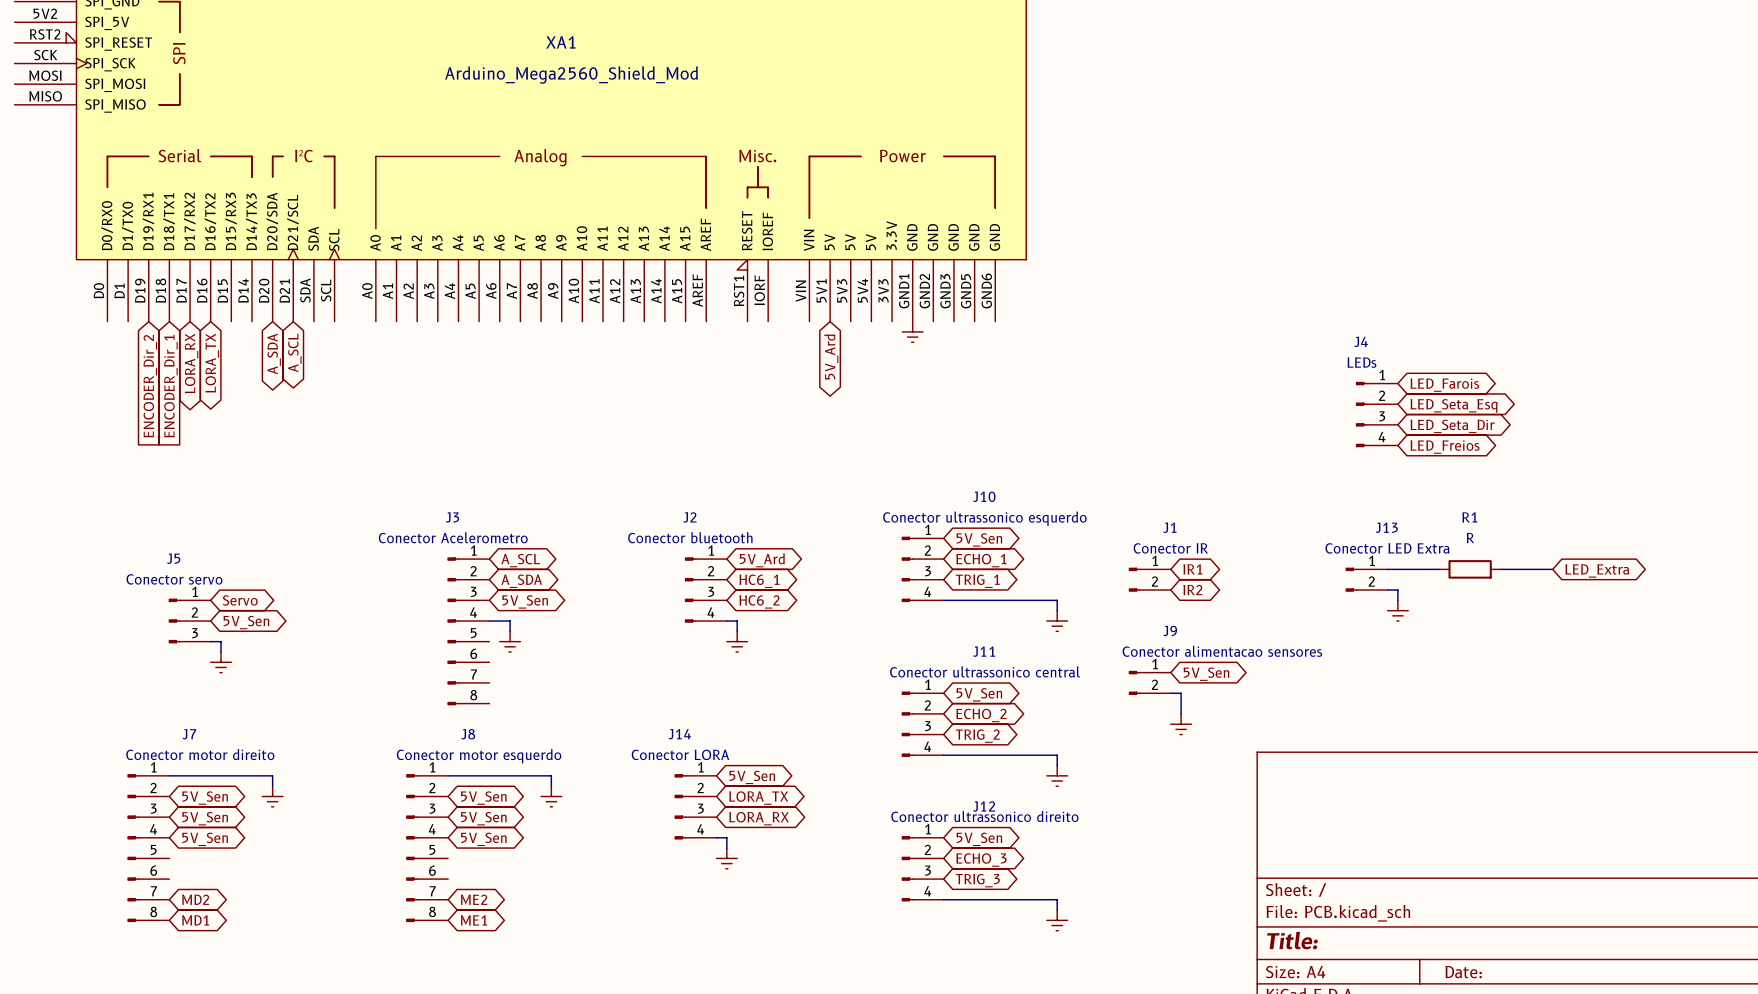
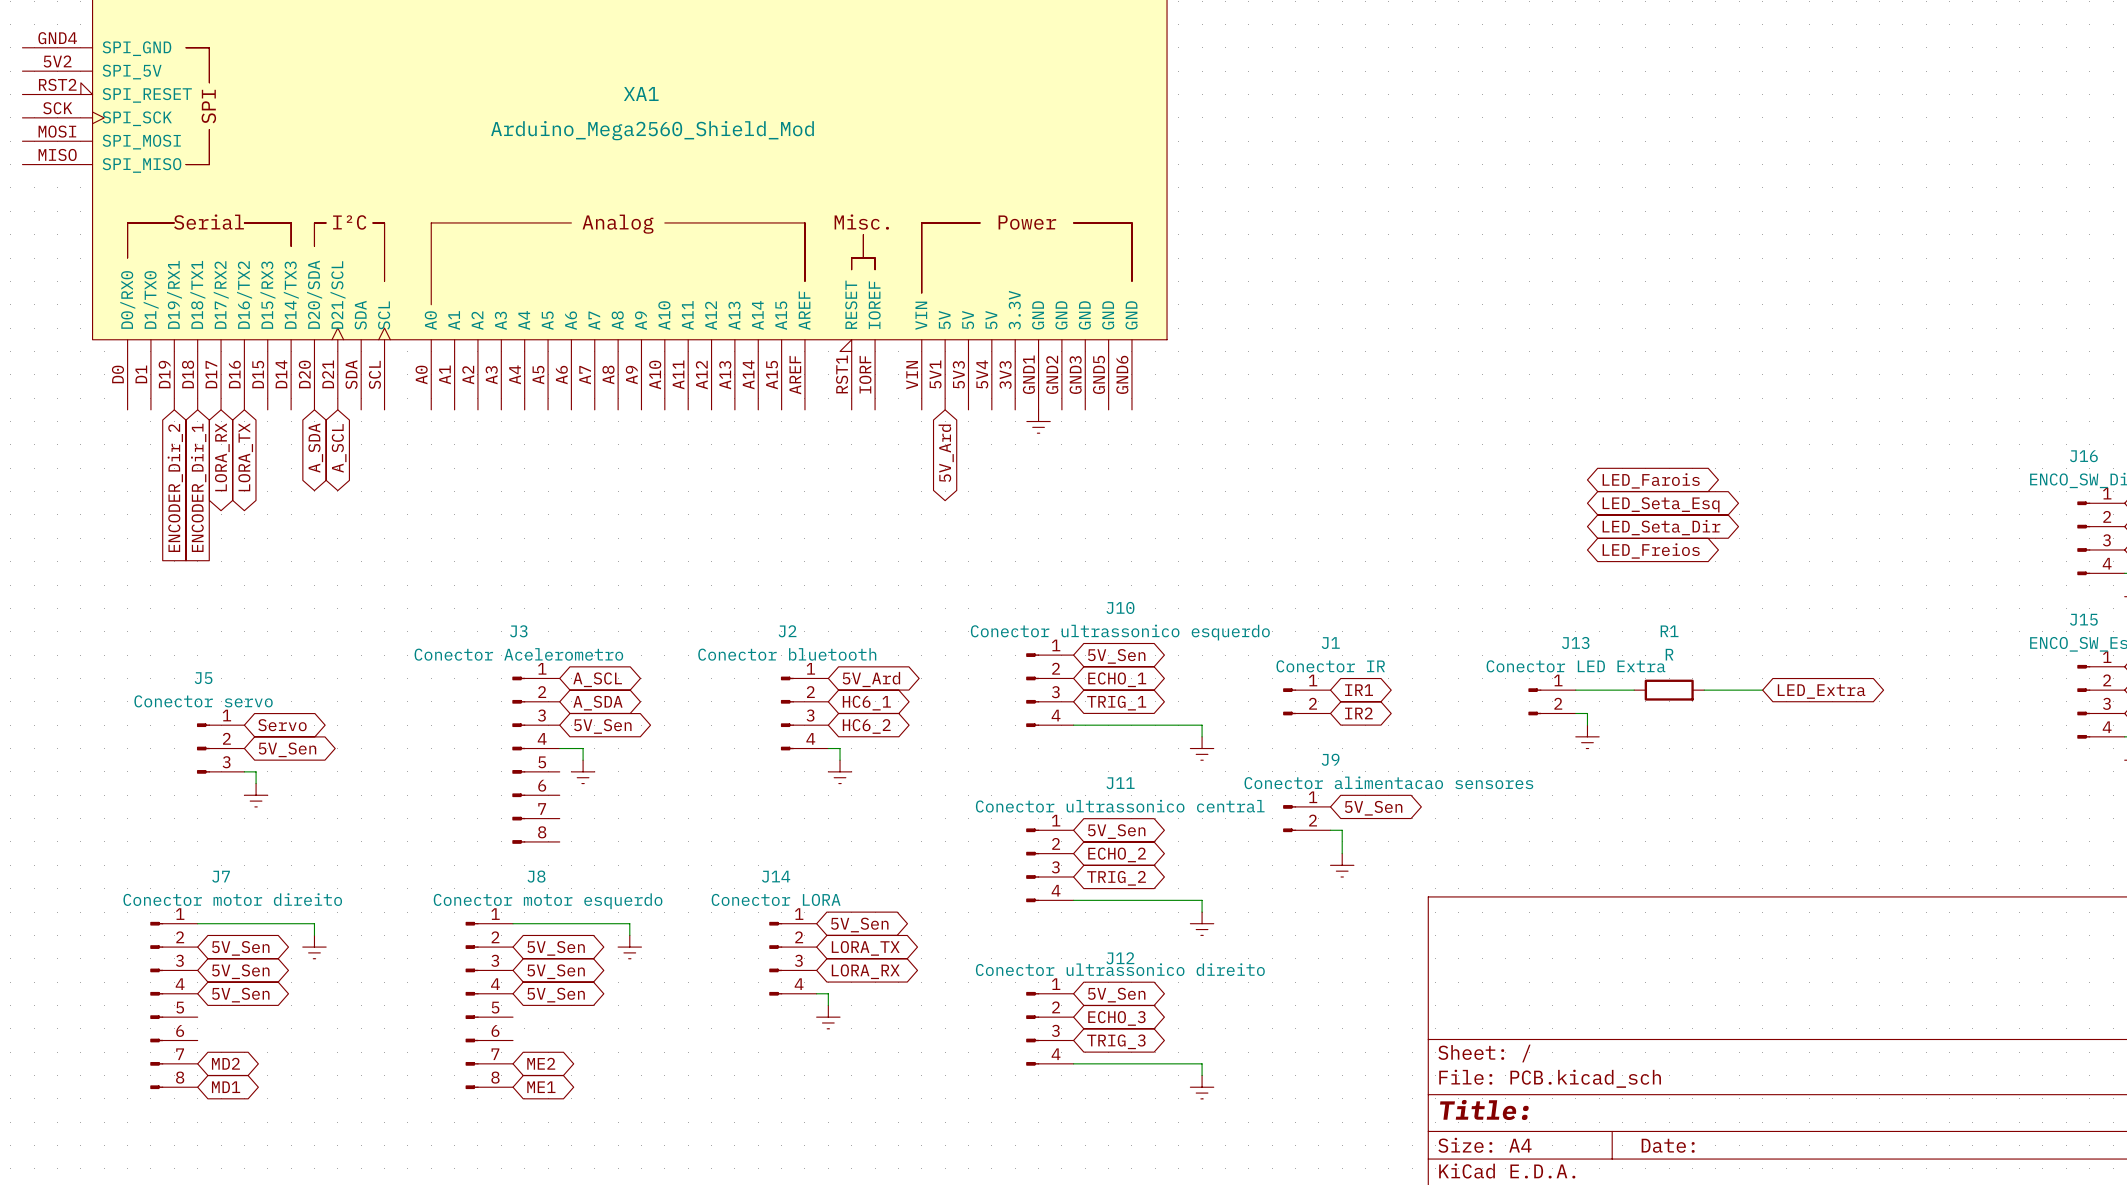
J4: LEDs (1376, 414) -> none

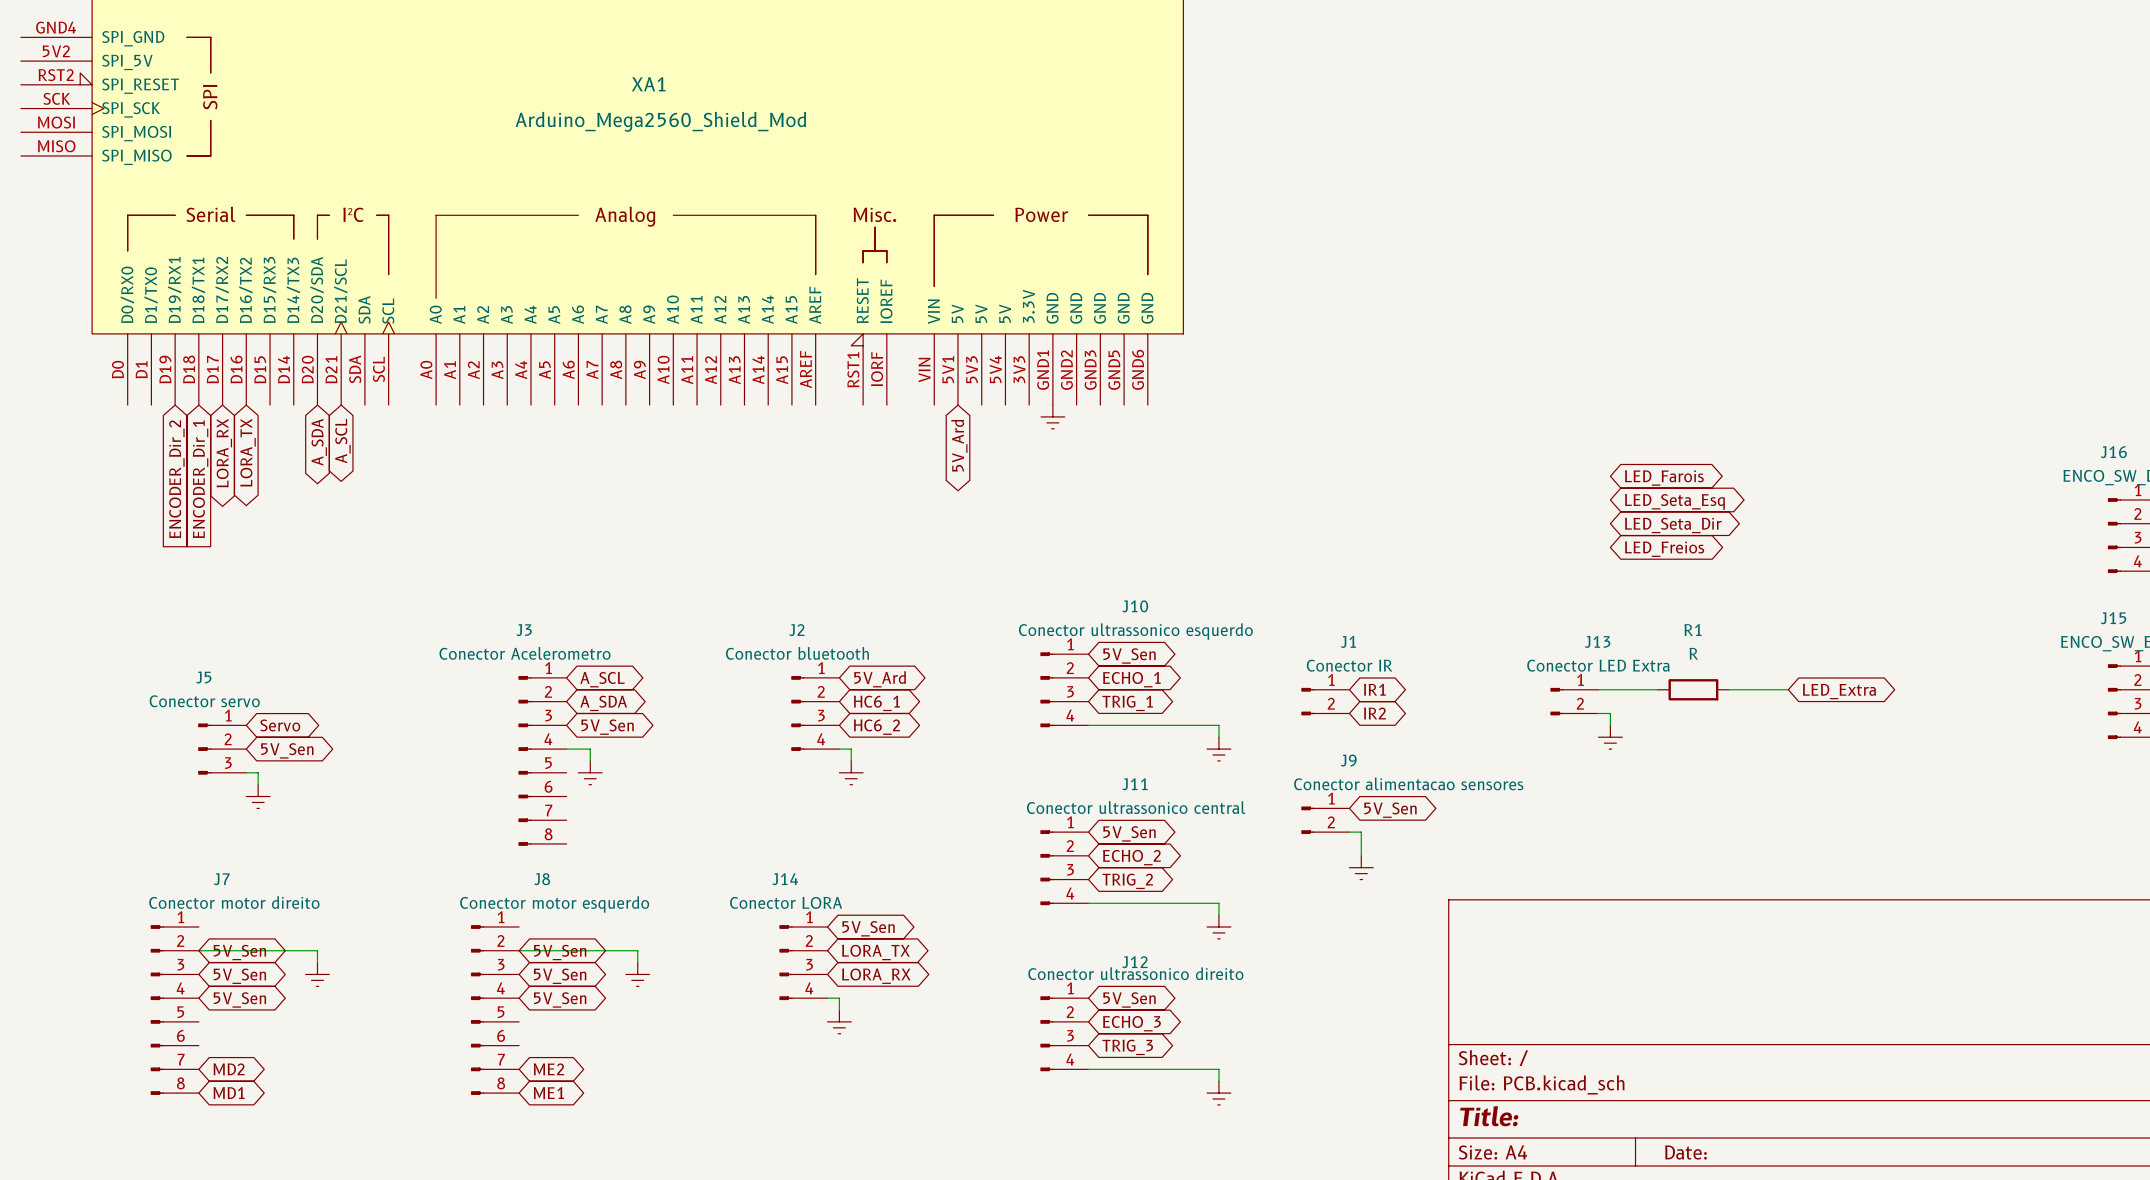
wire: (197, 923) (314, 923) (314, 935) -> (198, 950) (317, 950) (317, 962)
wire: (513, 923) (629, 923) (629, 935) -> (519, 950) (637, 950) (637, 962)
power symbol position: (314, 947) -> (317, 974)
power symbol position: (629, 947) -> (637, 974)

